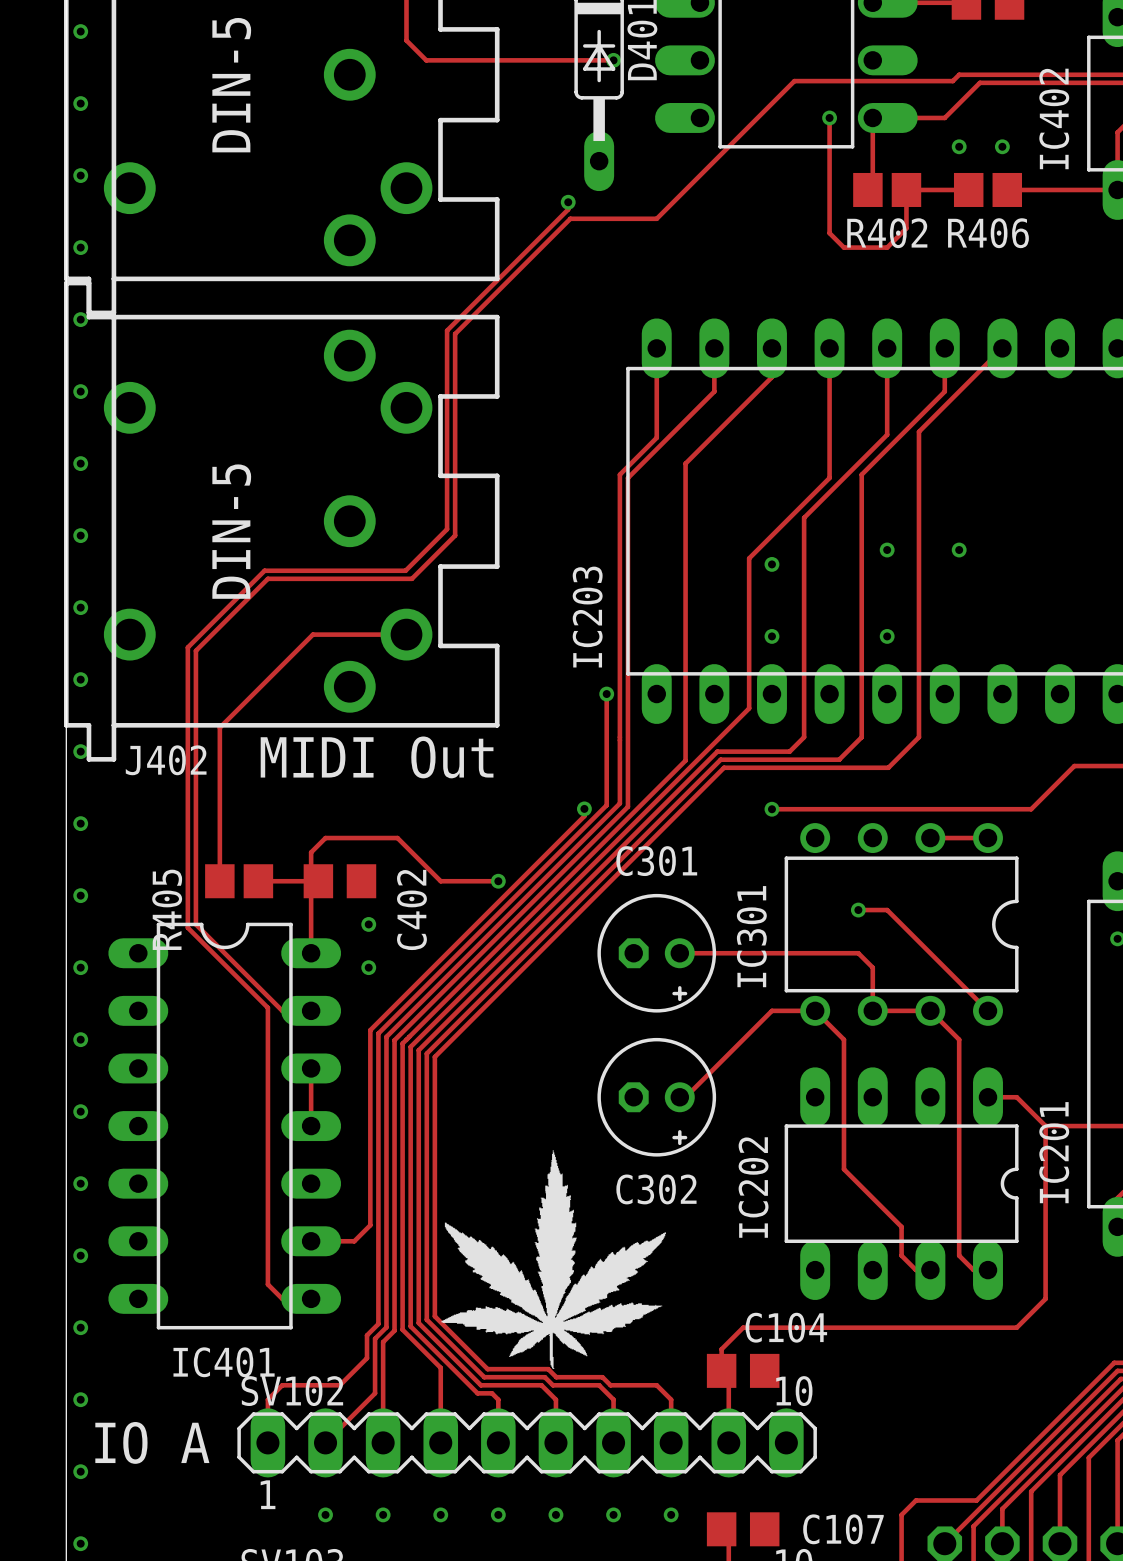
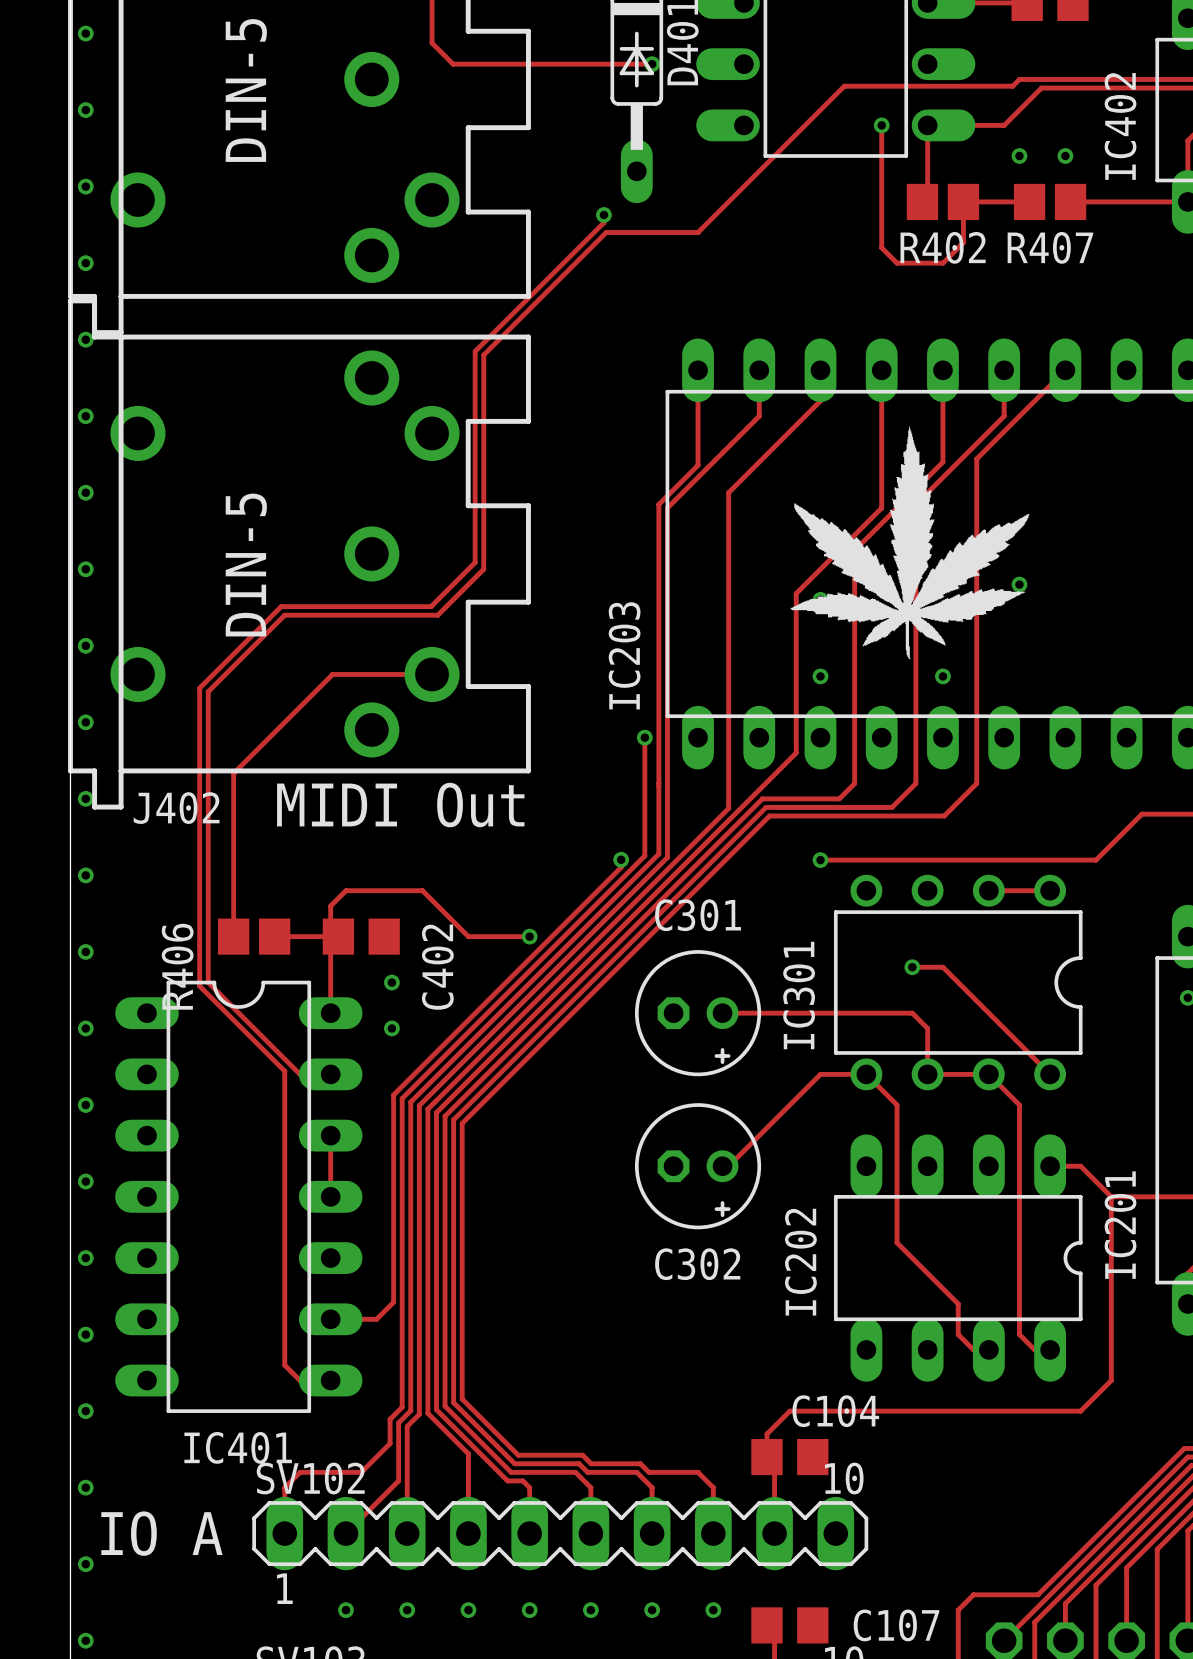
R406 name: R406 (988, 233) -> R407 (1050, 247)
drawing: none -> [790, 426, 1030, 660]
R405 name: R405 (167, 909) -> R406 (177, 966)
drawing: [441, 1150, 667, 1370] -> none

